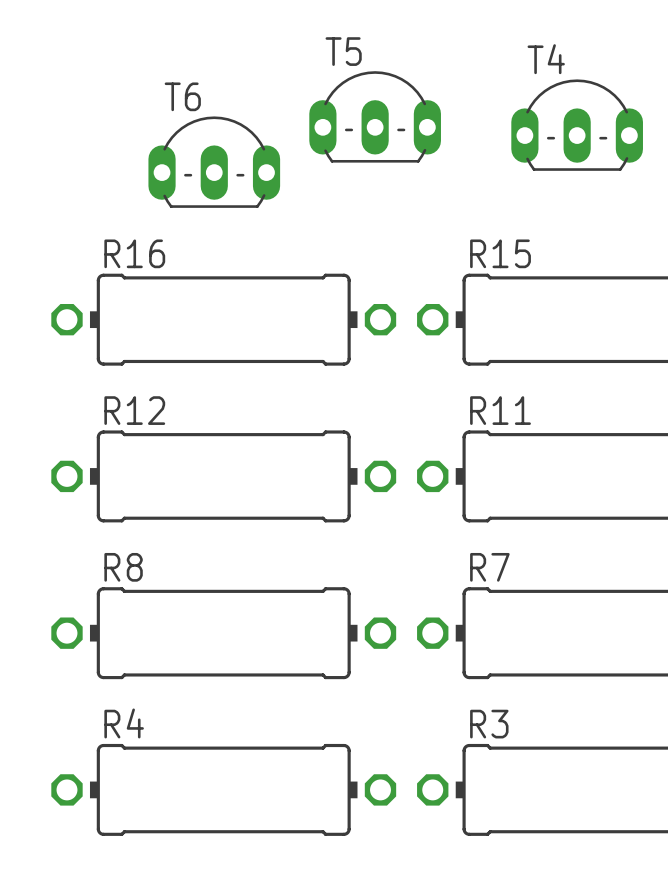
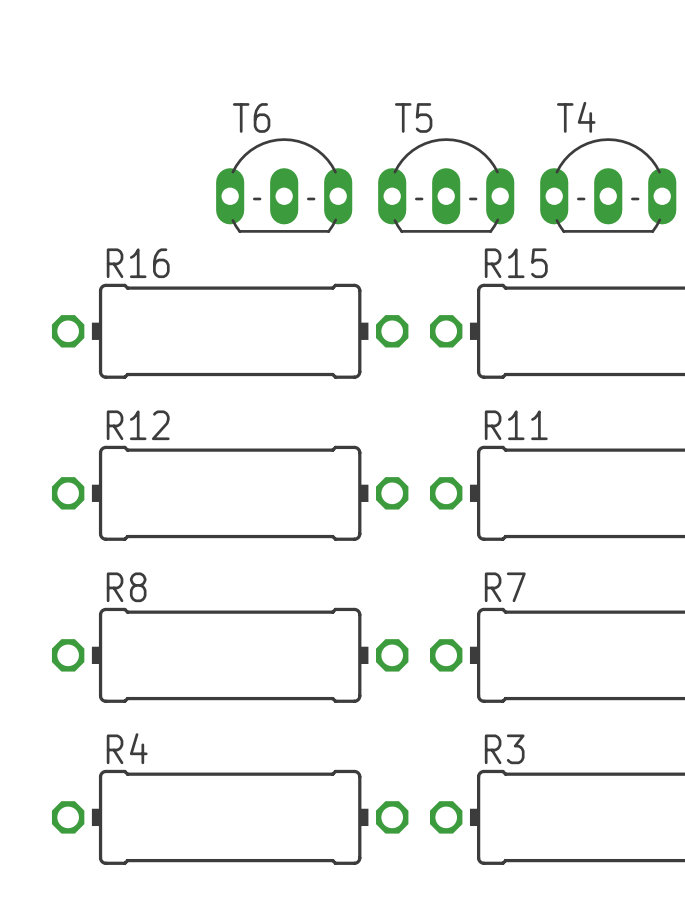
T5 position: (375, 116) -> (446, 185)
T4 position: (577, 125) -> (608, 185)
T6 position: (214, 162) -> (284, 185)

